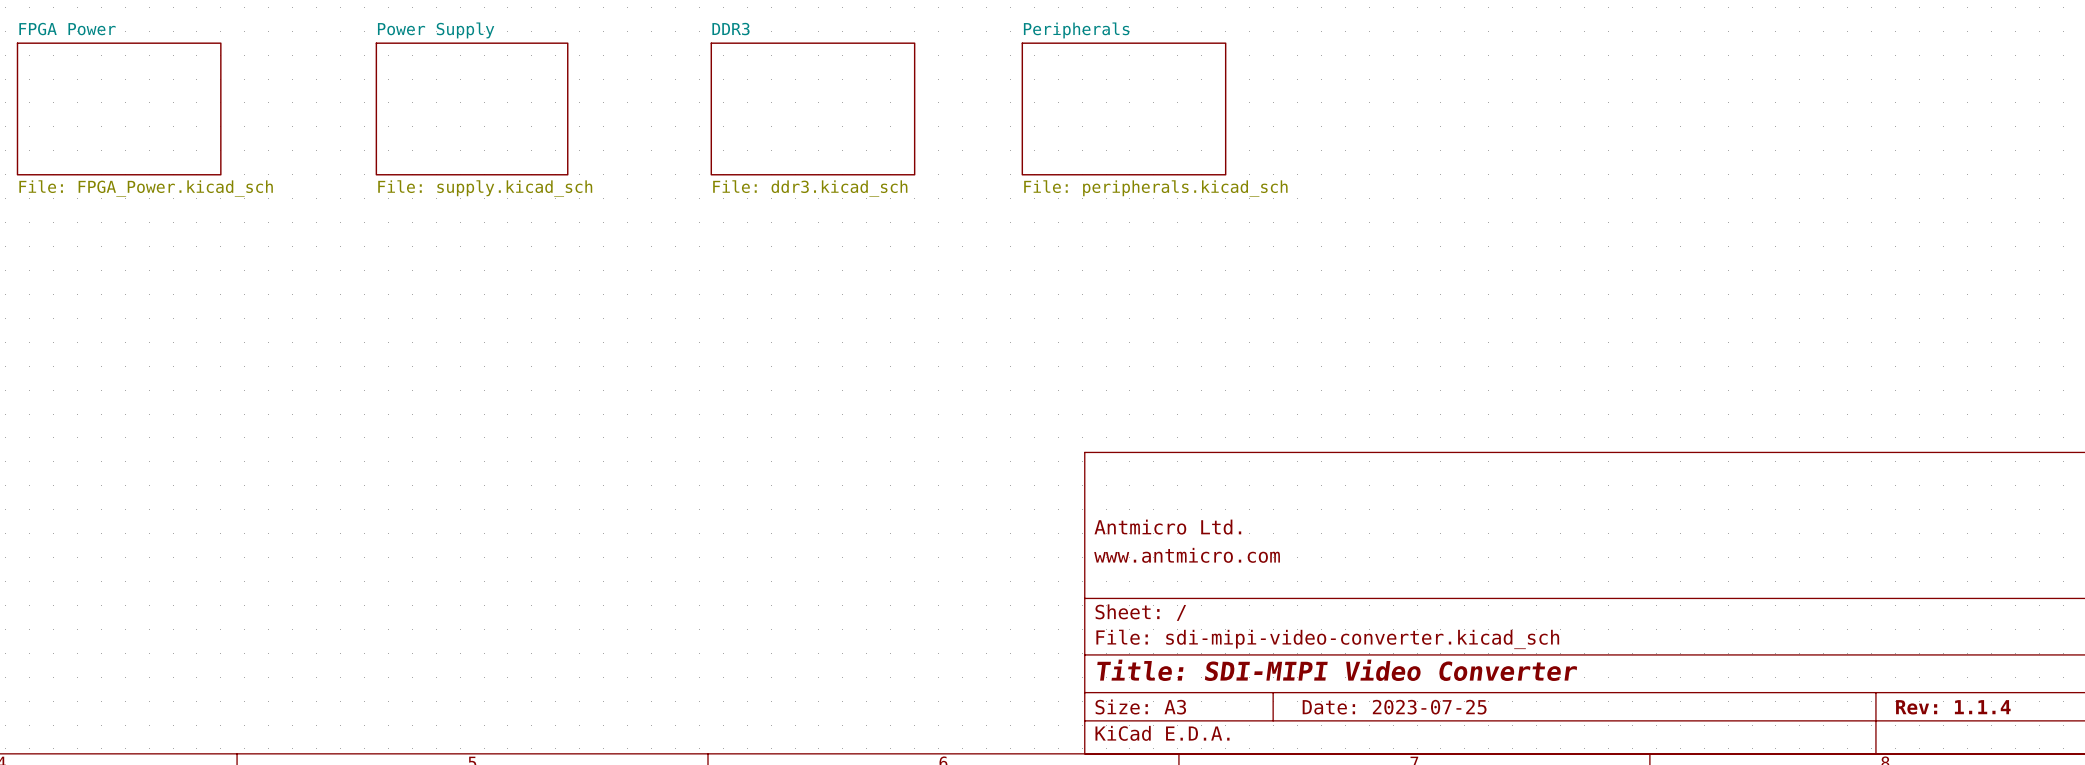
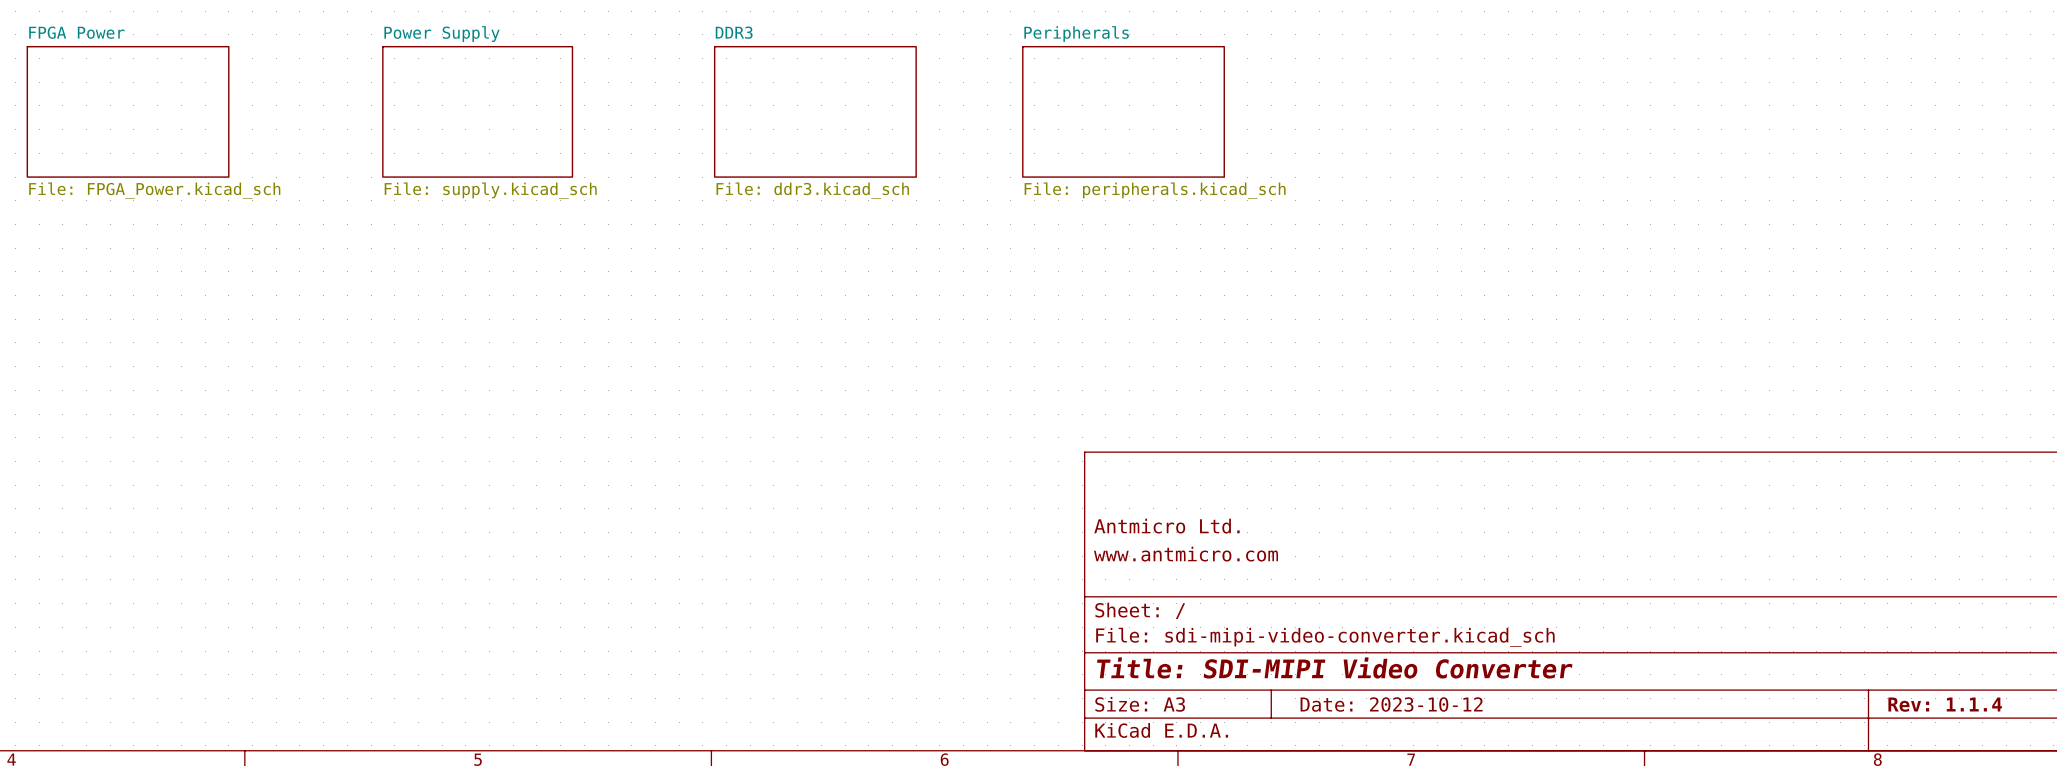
title block: Date: 2023-07-25 (1394, 707) -> Date: 2023-10-12 (1391, 704)

